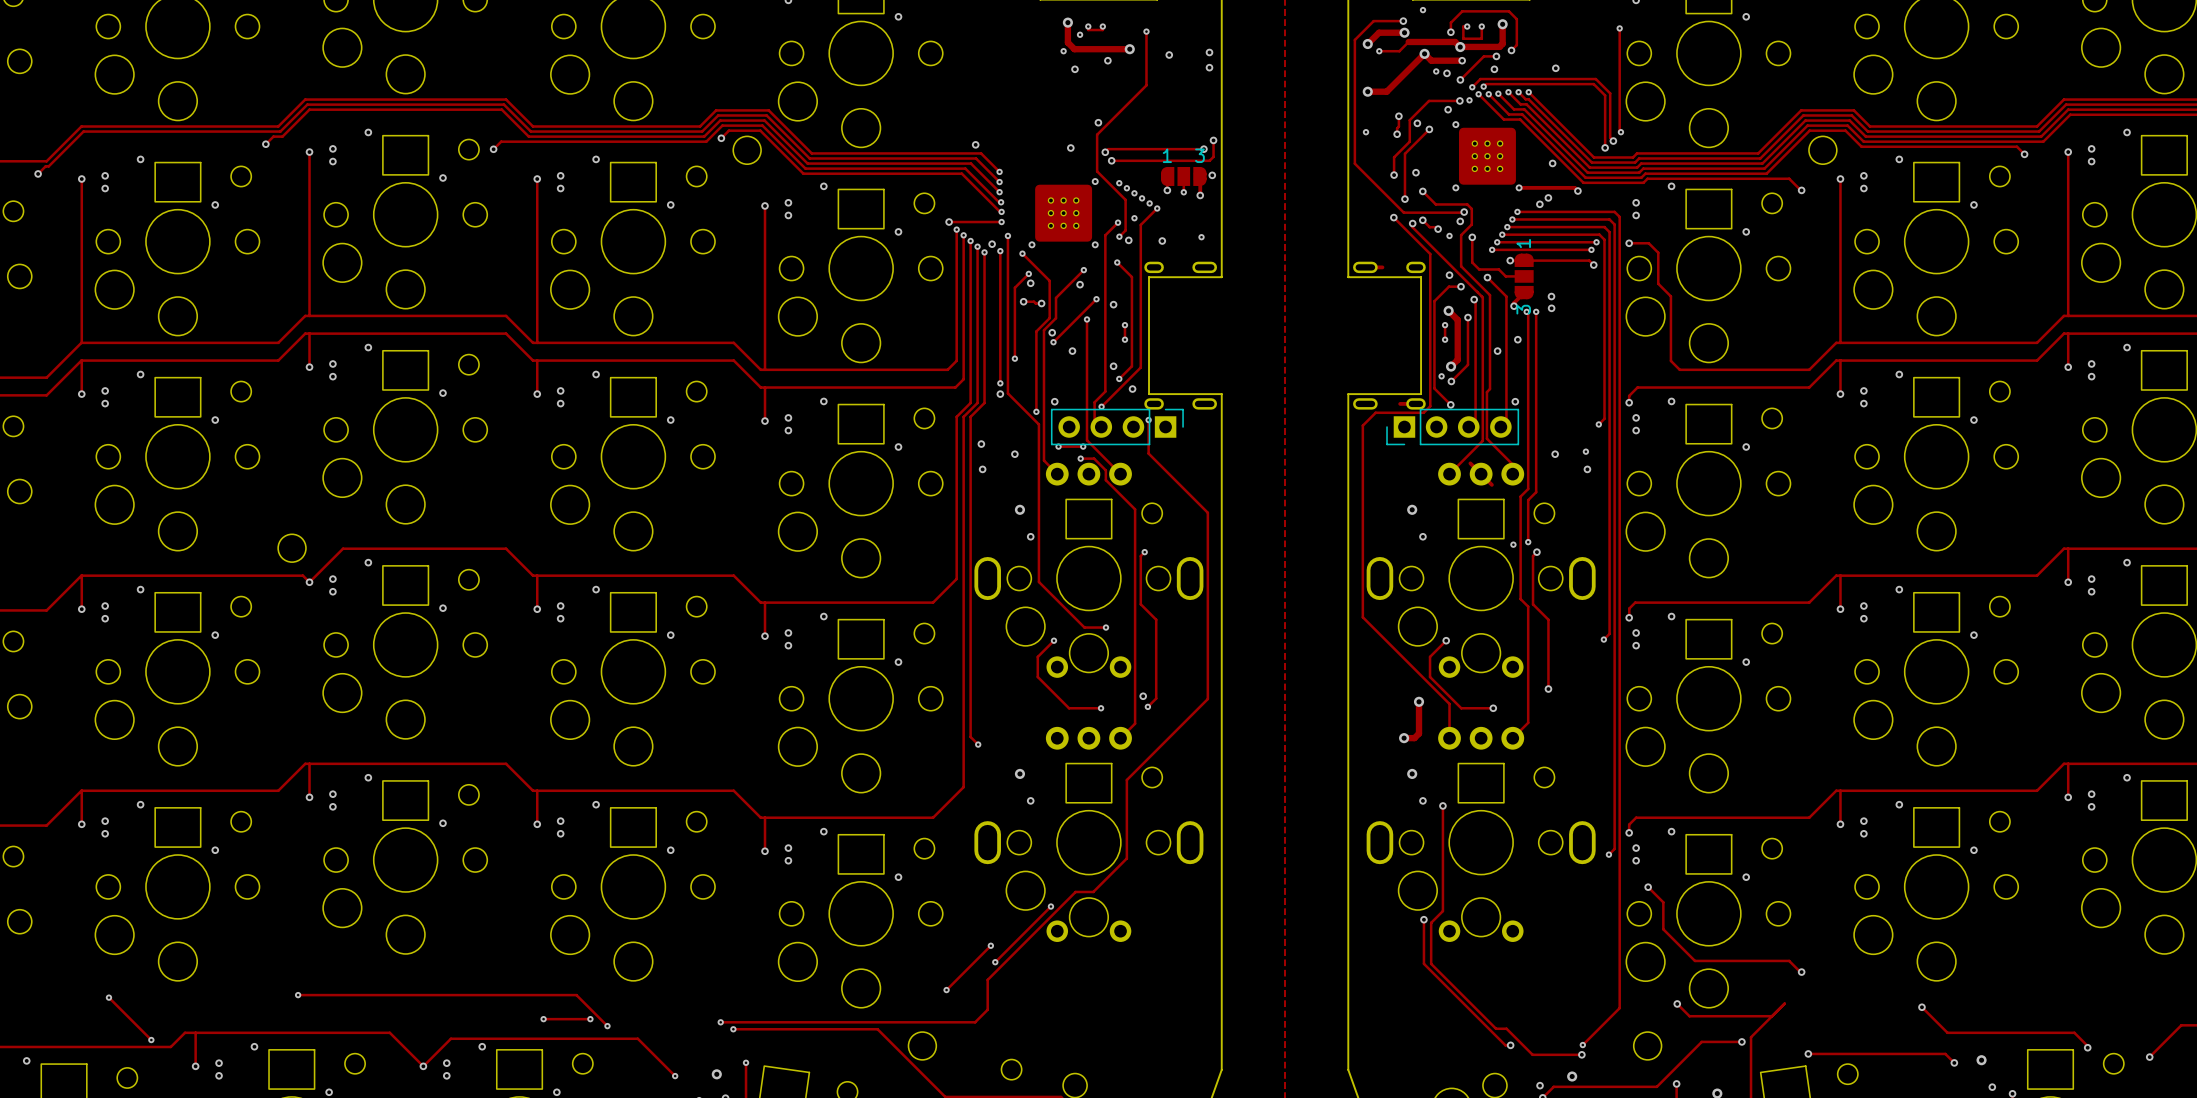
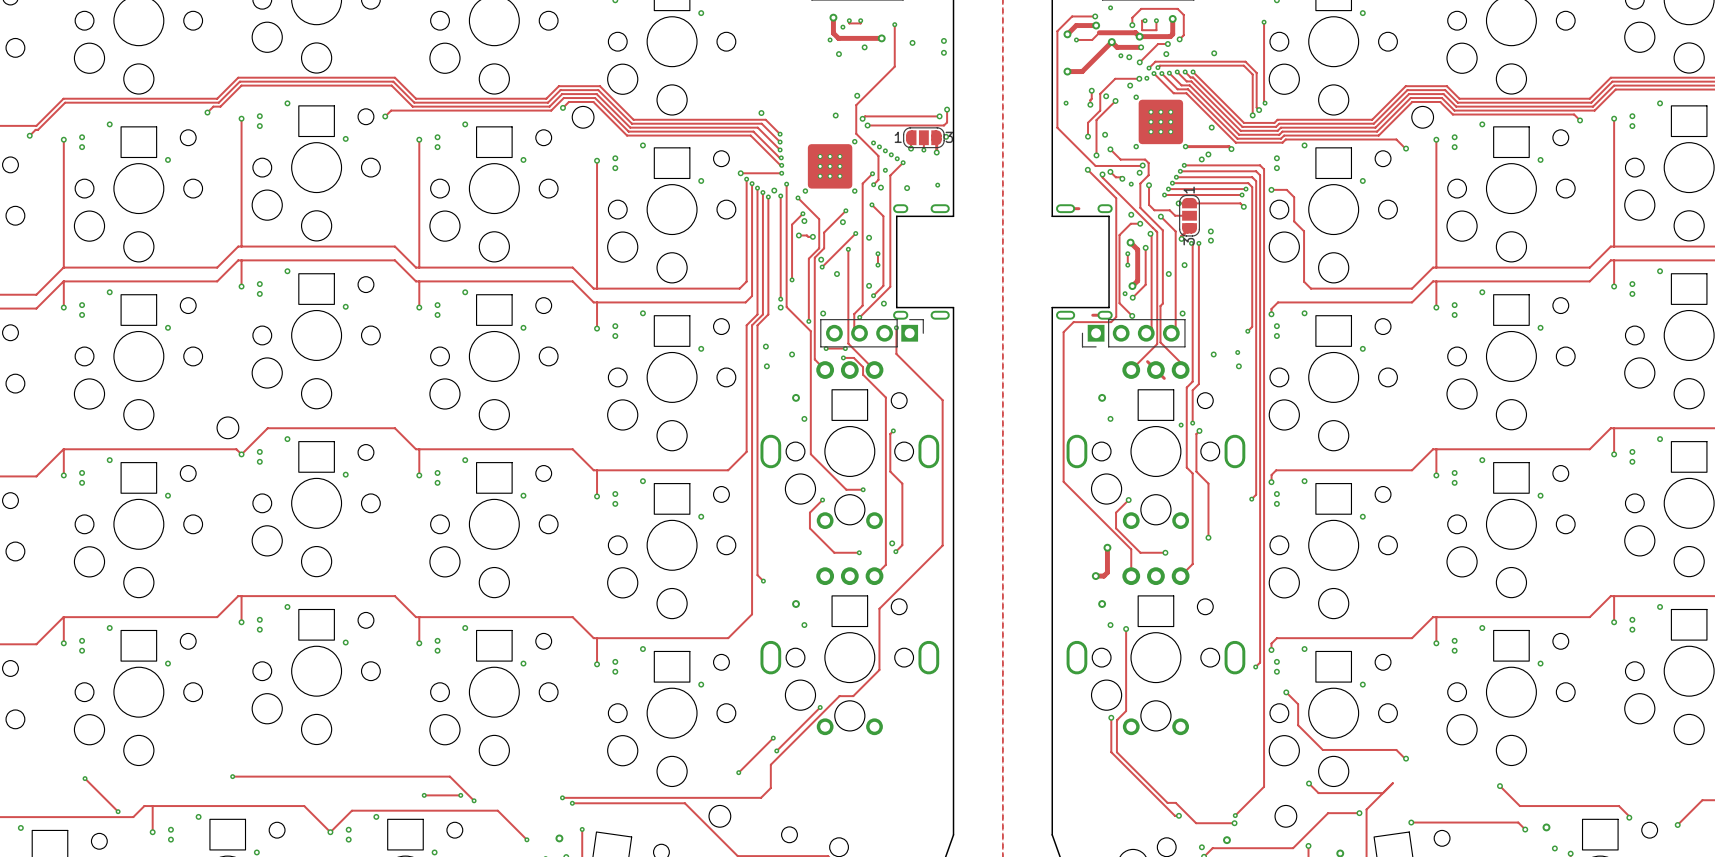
part footprint: [1161, 166, 1207, 186] -> [903, 127, 945, 149]
part footprint: [1514, 253, 1534, 300] -> [1179, 194, 1200, 237]

